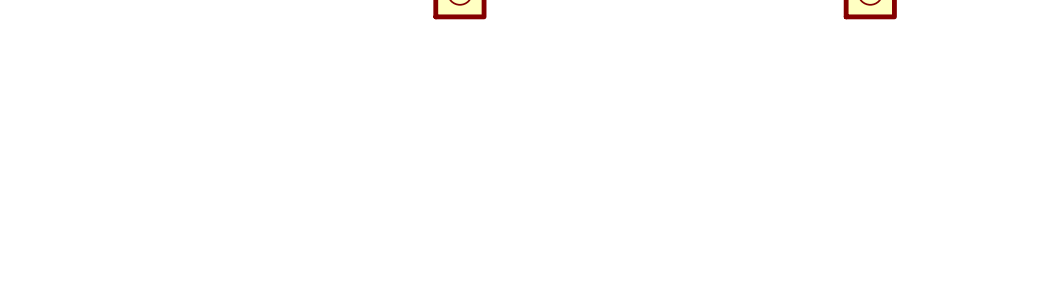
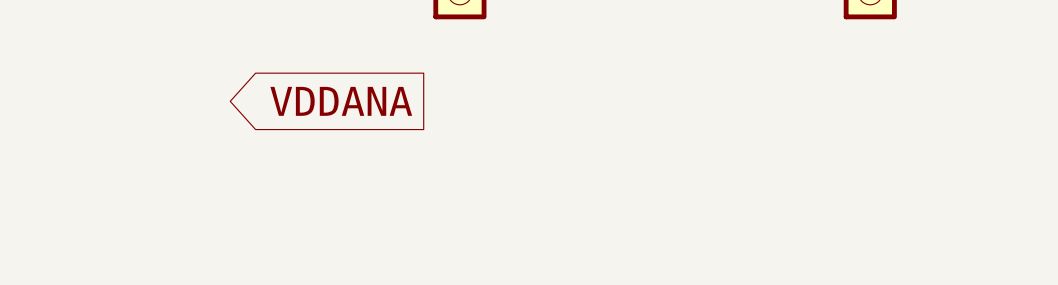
global label: none -> VDDANA (341, 101)

